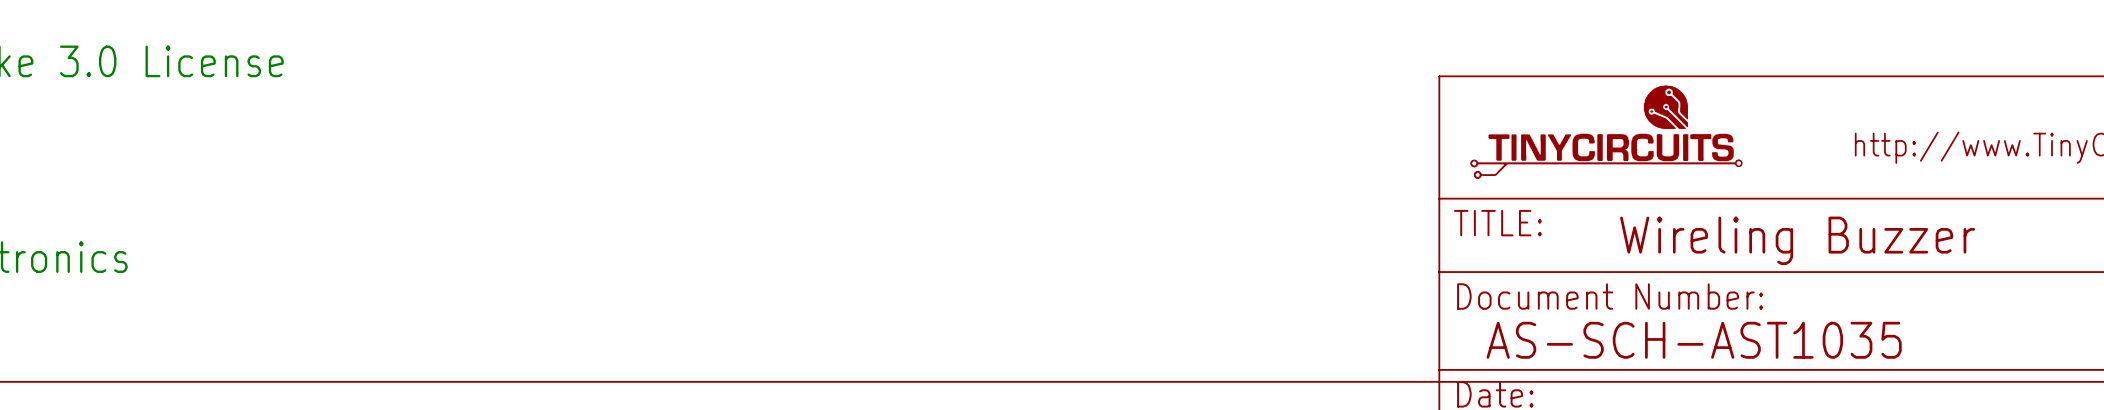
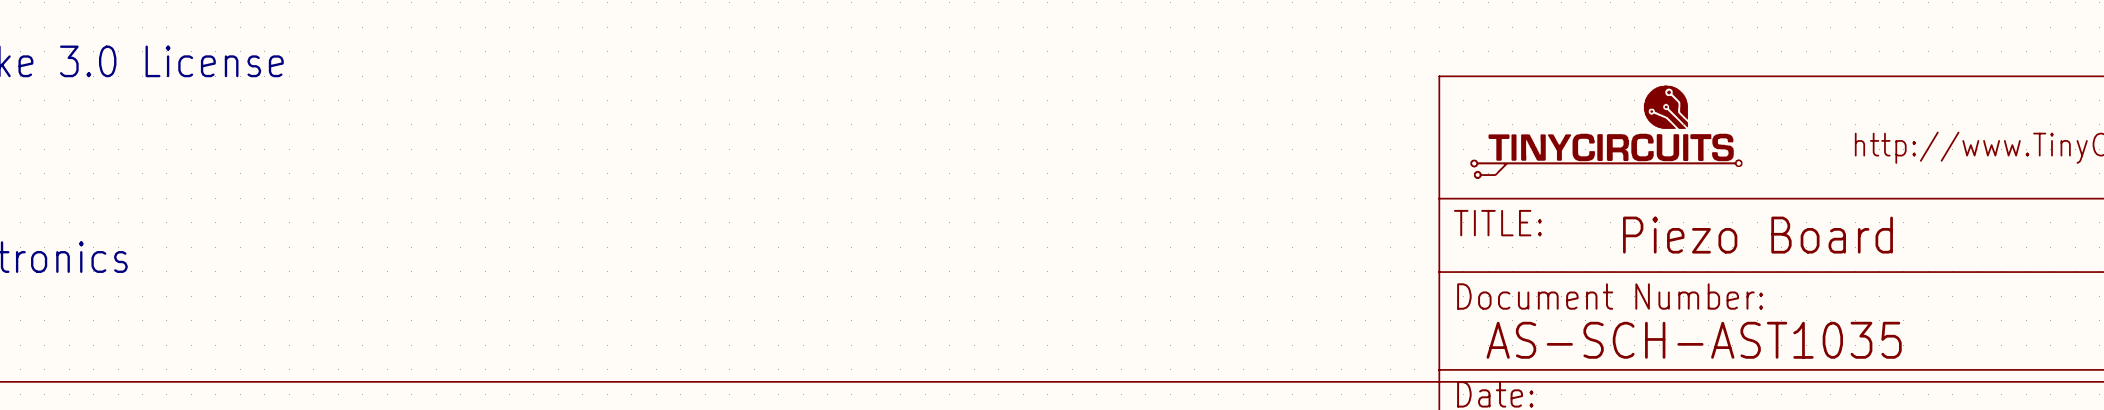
text: Wireling Buzzer (1797, 240) -> Piezo Board (1757, 235)

